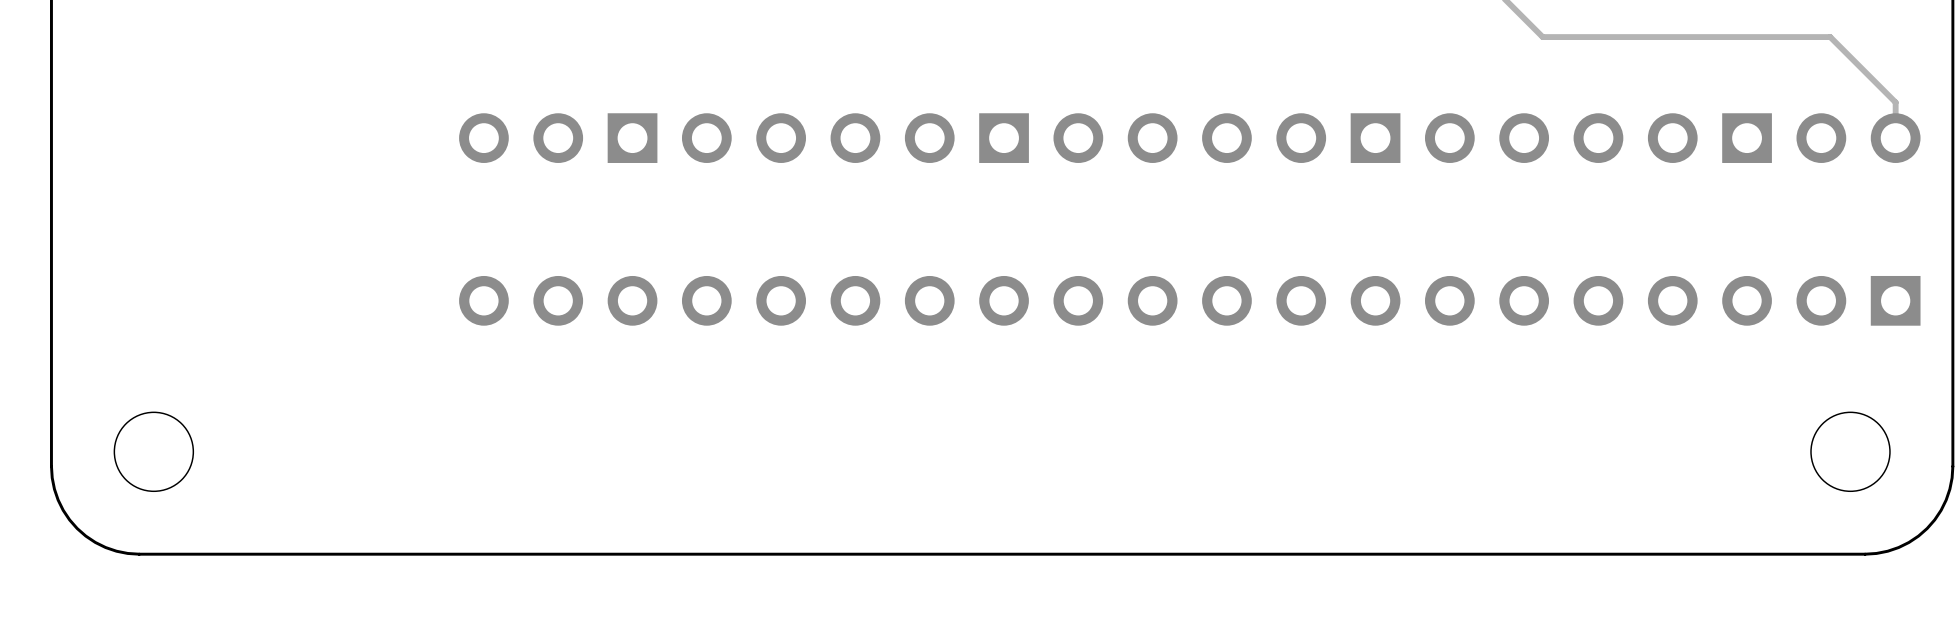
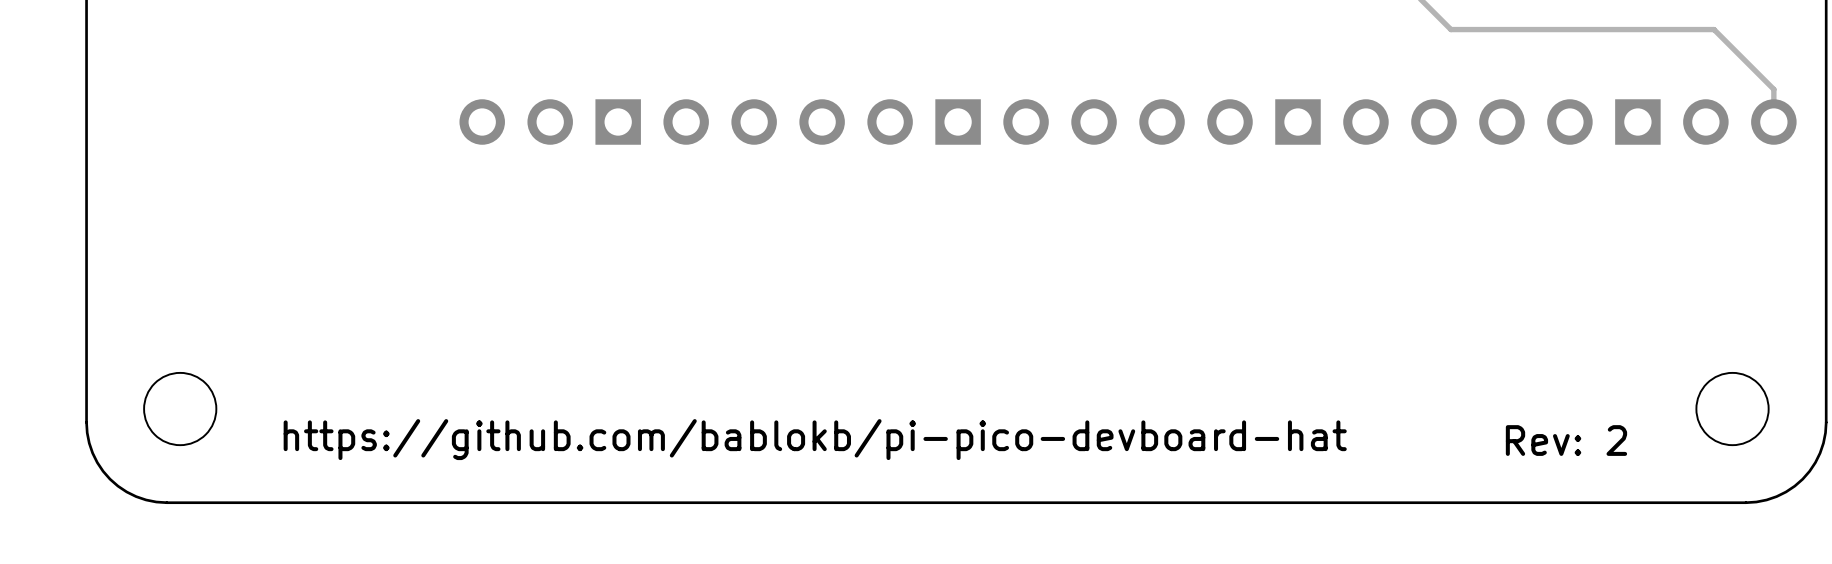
part: (1189, 300) -> none
text: none -> https://github.com/bablokb/pi-pico-devboard-hat (815, 439)
text: none -> Rev: 2 (1566, 440)

